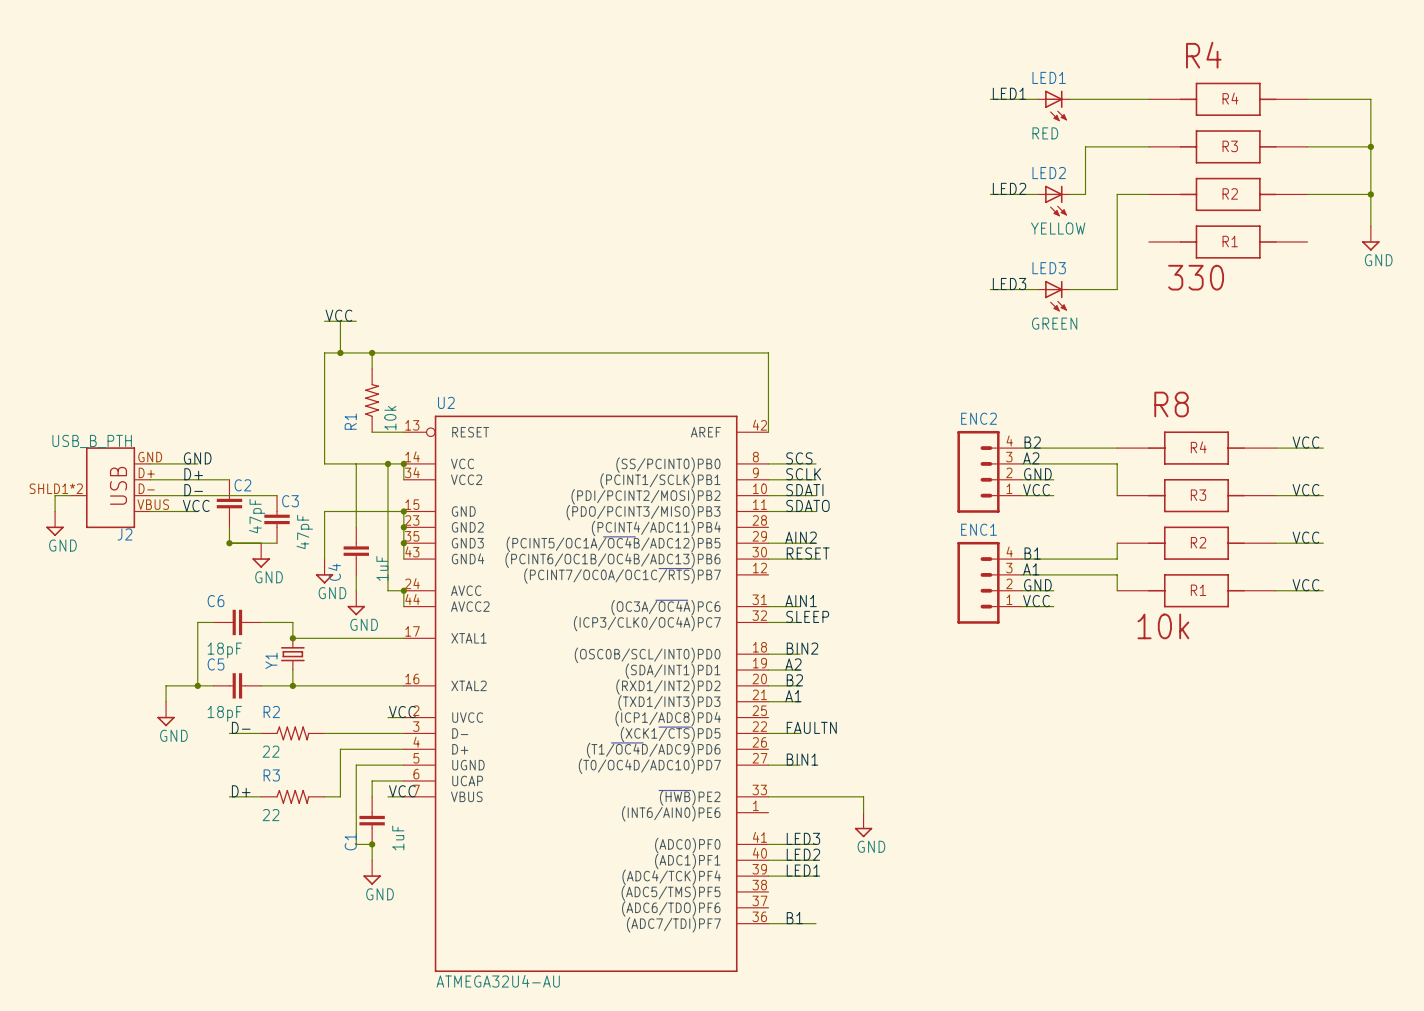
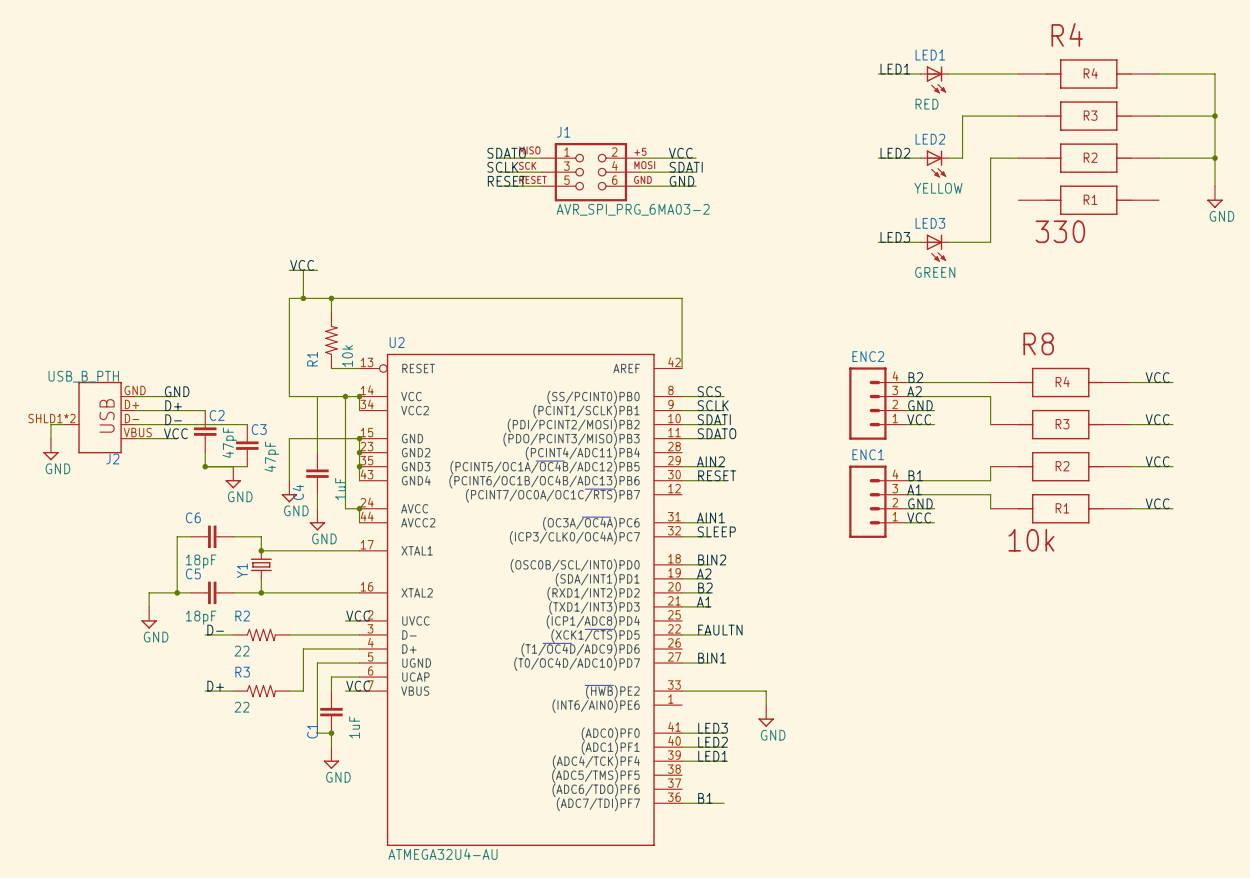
label: none -> SDATO (506, 153)
label: none -> VCC (680, 153)
wire: none -> (499, 158) (541, 158)
wire: none -> (639, 158) (696, 158)
label: none -> SCLK (502, 167)
label: none -> SDATI (686, 167)
wire: none -> (499, 172) (541, 172)
J1: none -> AVR_SPI_PRG_6MA03-2 (590, 172)
wire: none -> (639, 172) (696, 172)
label: none -> RESET (506, 181)
label: none -> GND (682, 181)
wire: none -> (499, 186) (541, 186)
wire: none -> (639, 186) (696, 186)

